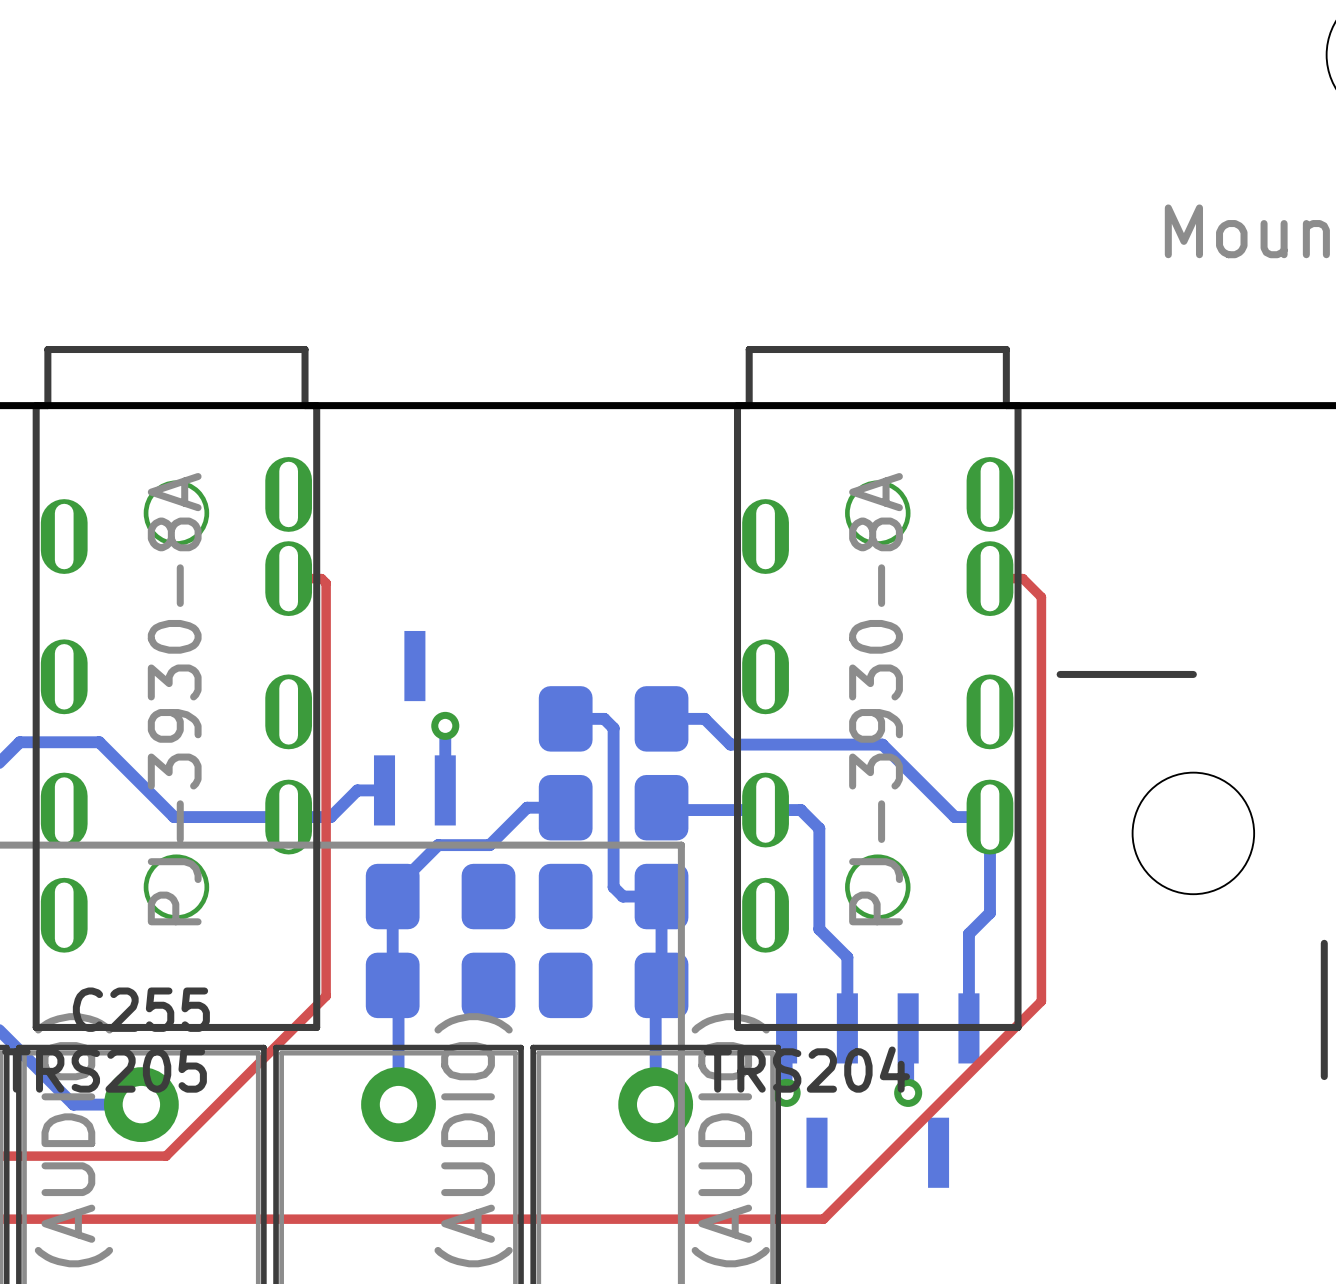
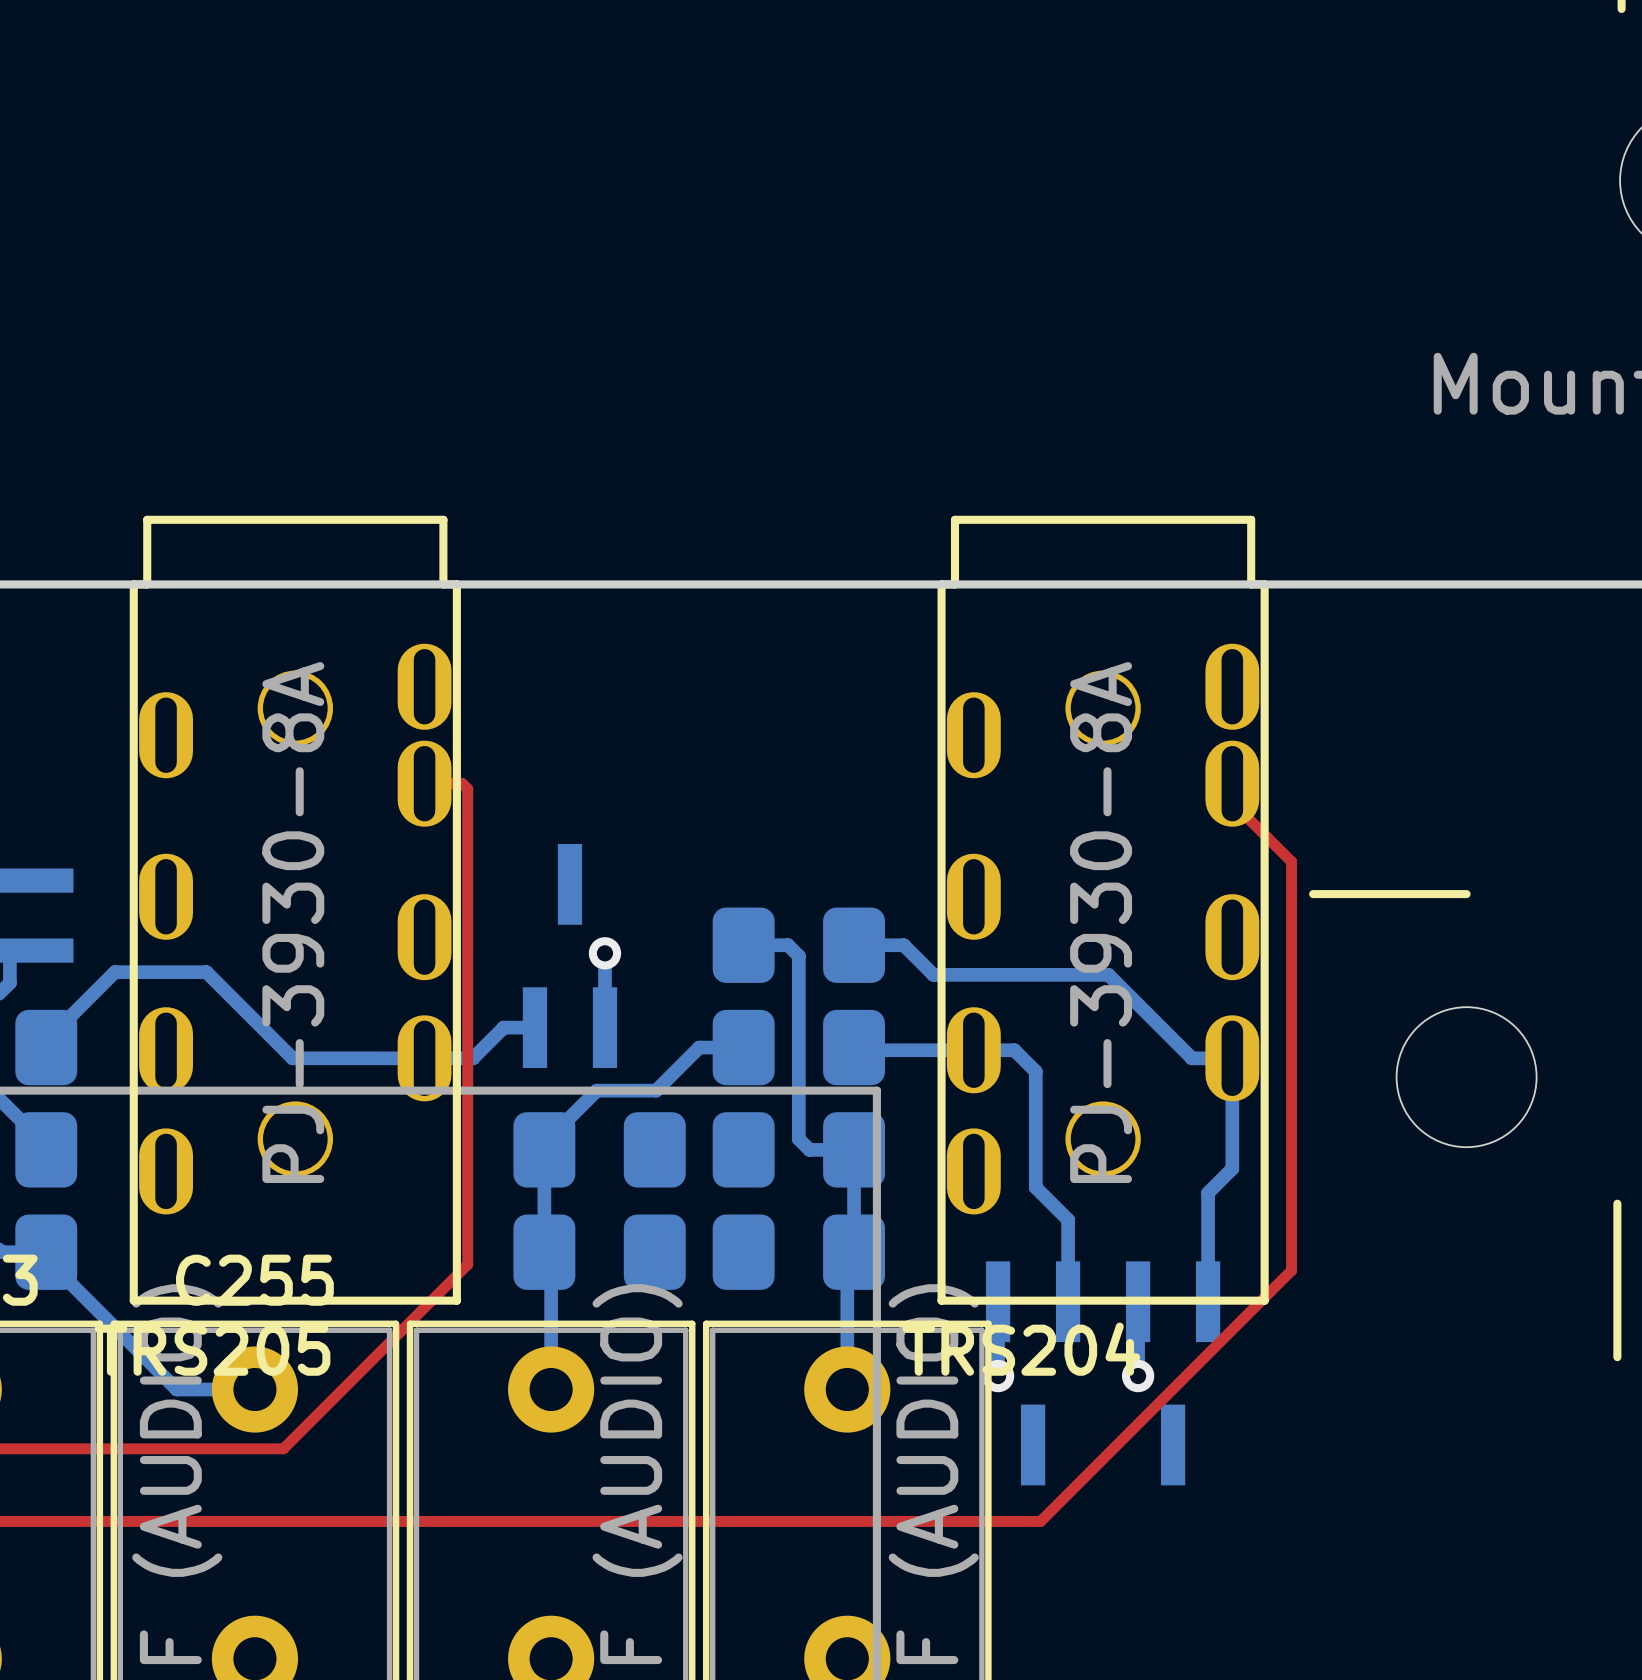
top track: (989, 578) (1022, 578) (1041, 597) (1041, 646) -> (1232, 783) (1232, 802) (1291, 861)

